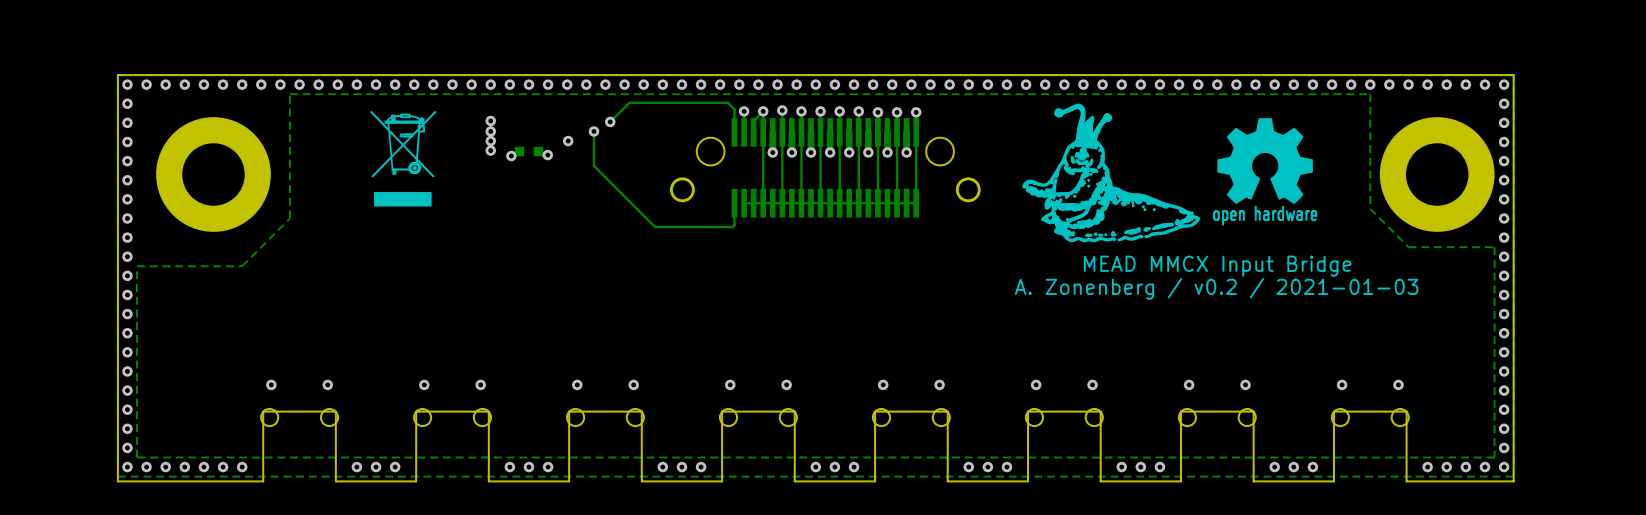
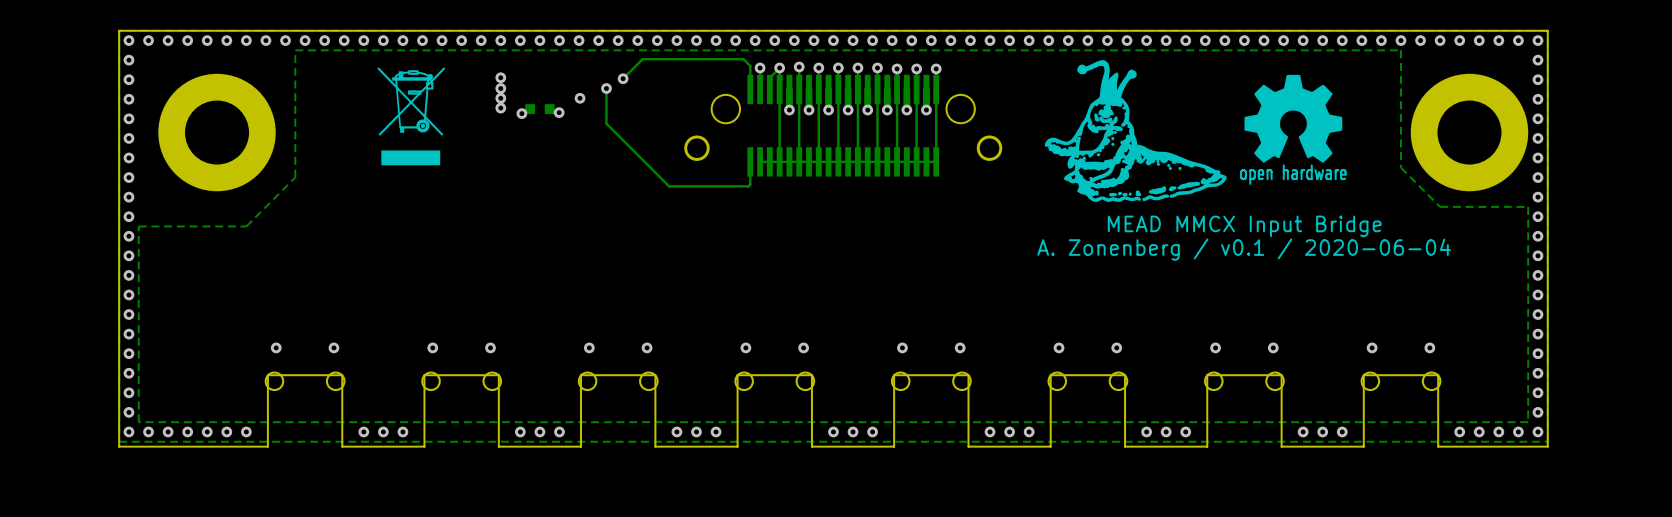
text: A. Zonenberg / v0.2 / 2021-01-03 (1216, 288) -> A. Zonenberg / v0.1 / 2020-06-04 (1244, 249)

